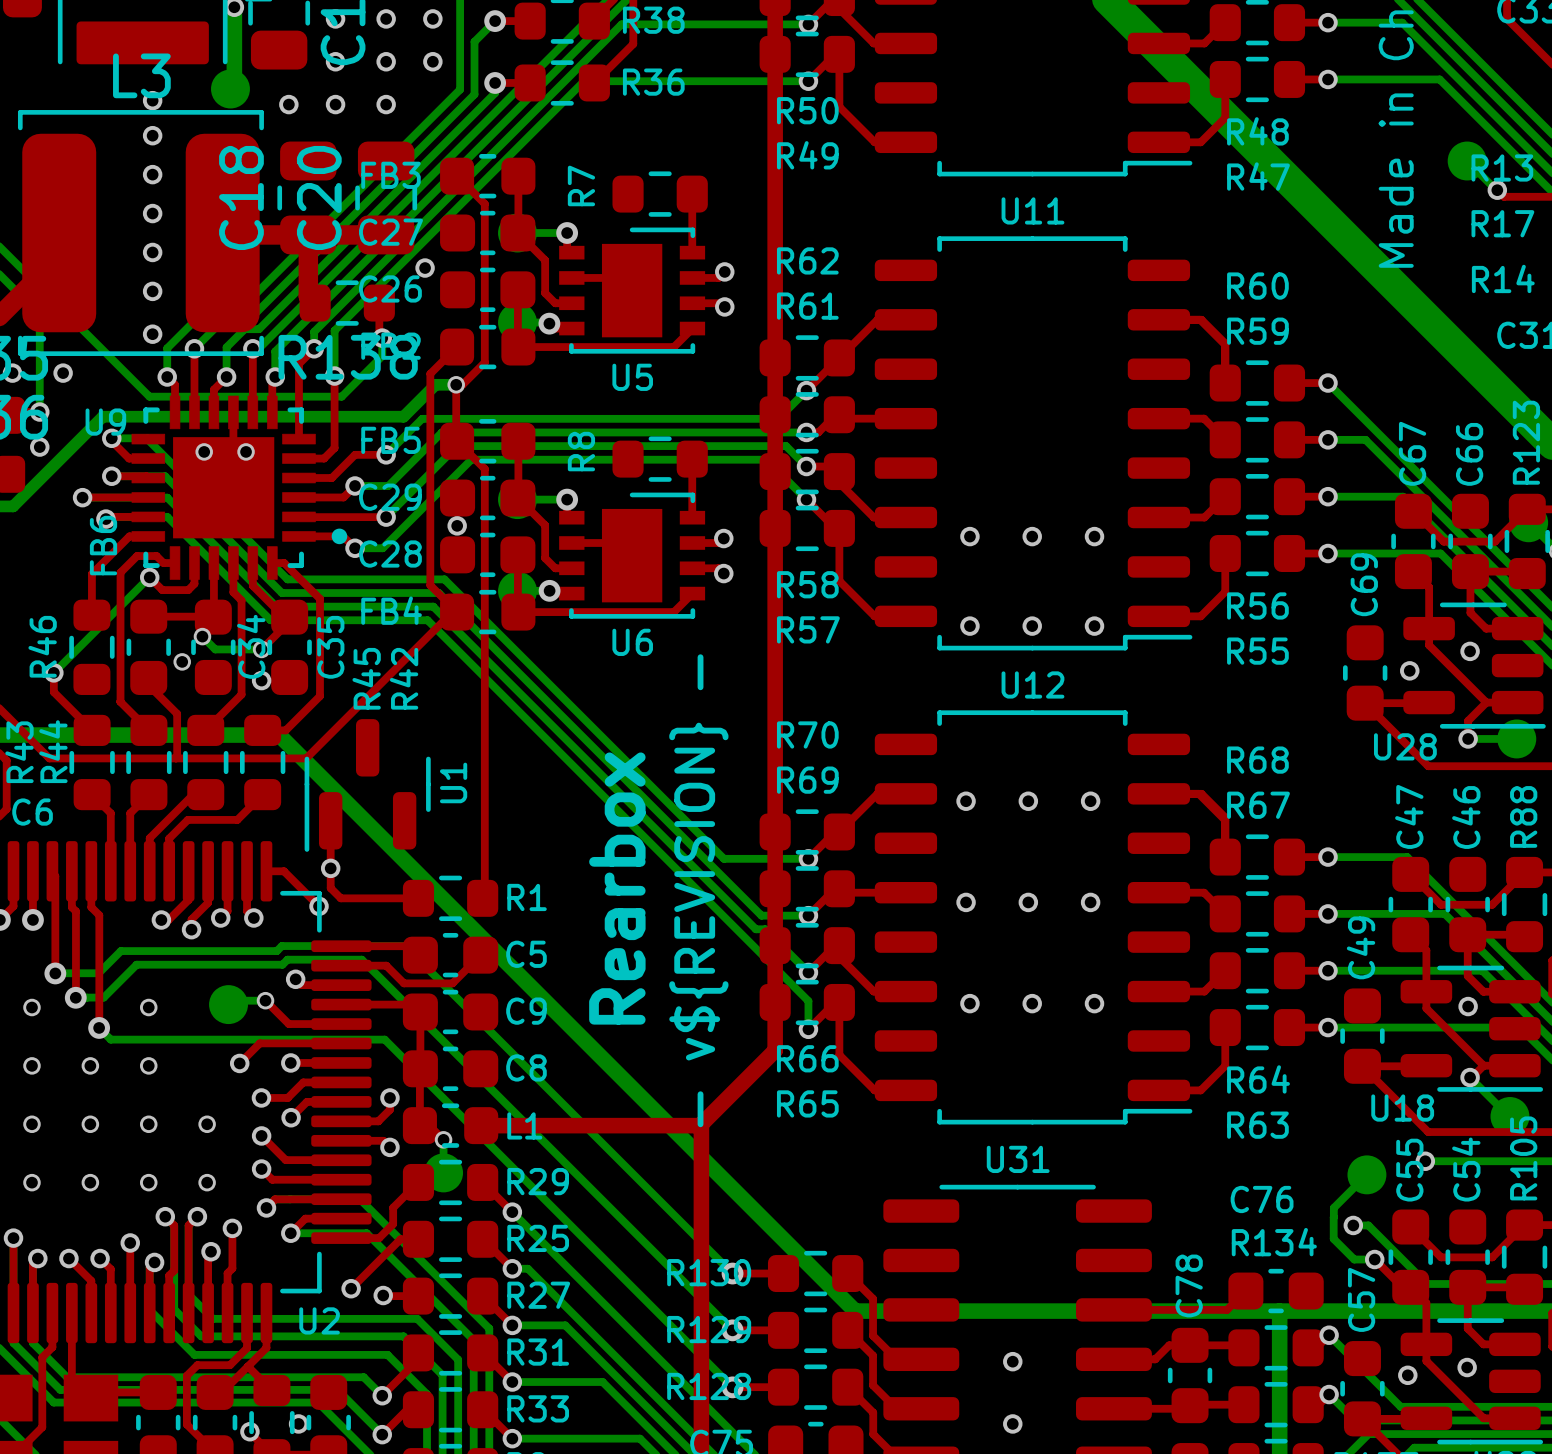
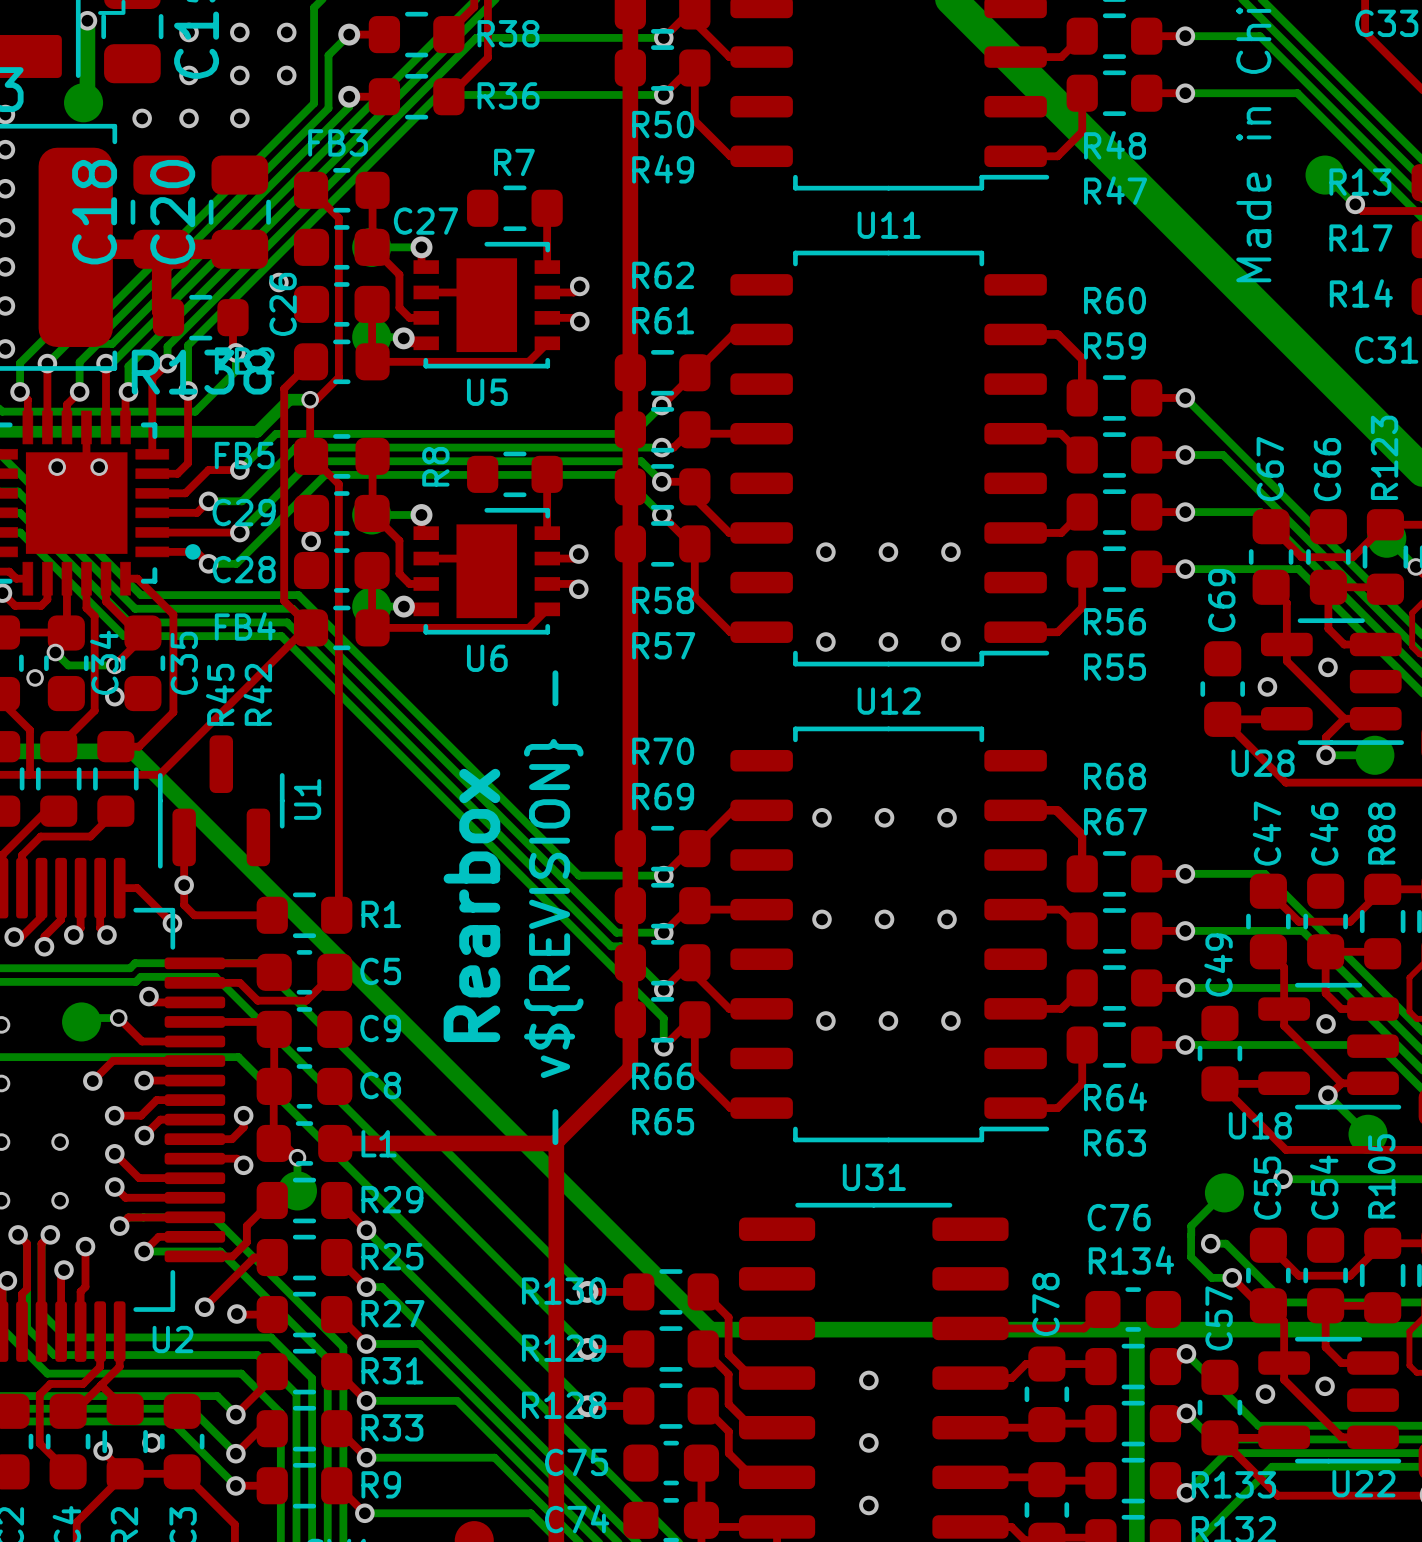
FB3 name position: FB3 (390, 175) -> FB3 (338, 142)
R7 name rotation: 0° (581, 185) -> 90° clockwise (514, 162)
R7 name position: R7 (581, 185) -> R7 (514, 162)
C27 name position: C27 (390, 232) -> C27 (425, 221)
C26 name rotation: 0° (390, 288) -> 90° counterclockwise (283, 304)

